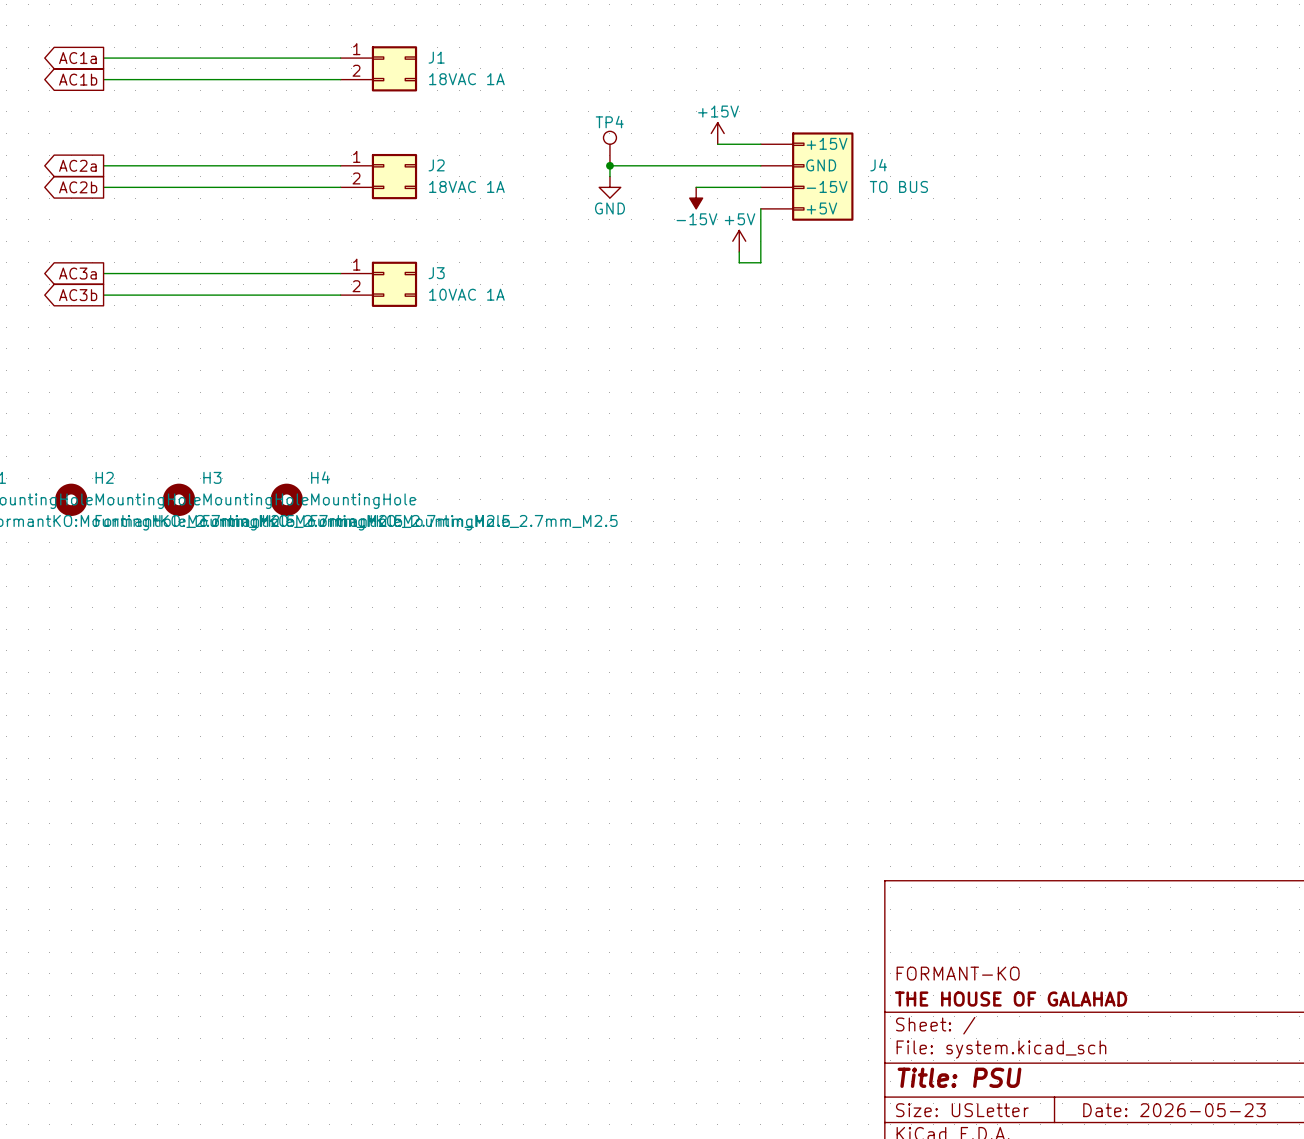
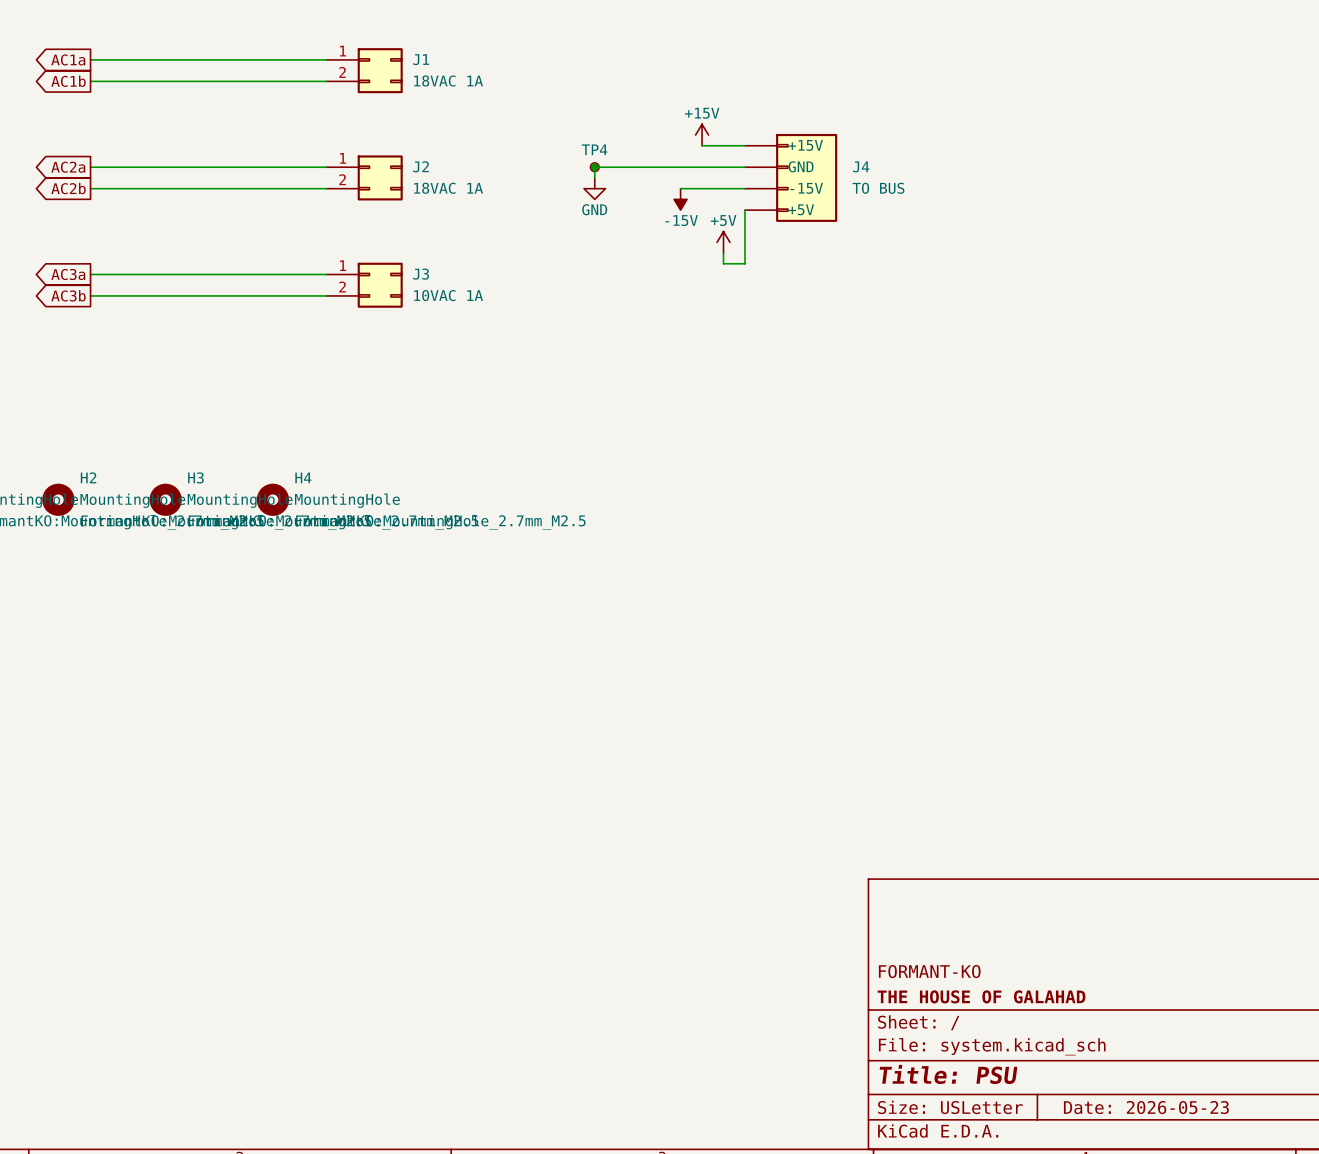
TP4 symbol: [603, 131, 617, 166] -> [590, 162, 600, 172]

